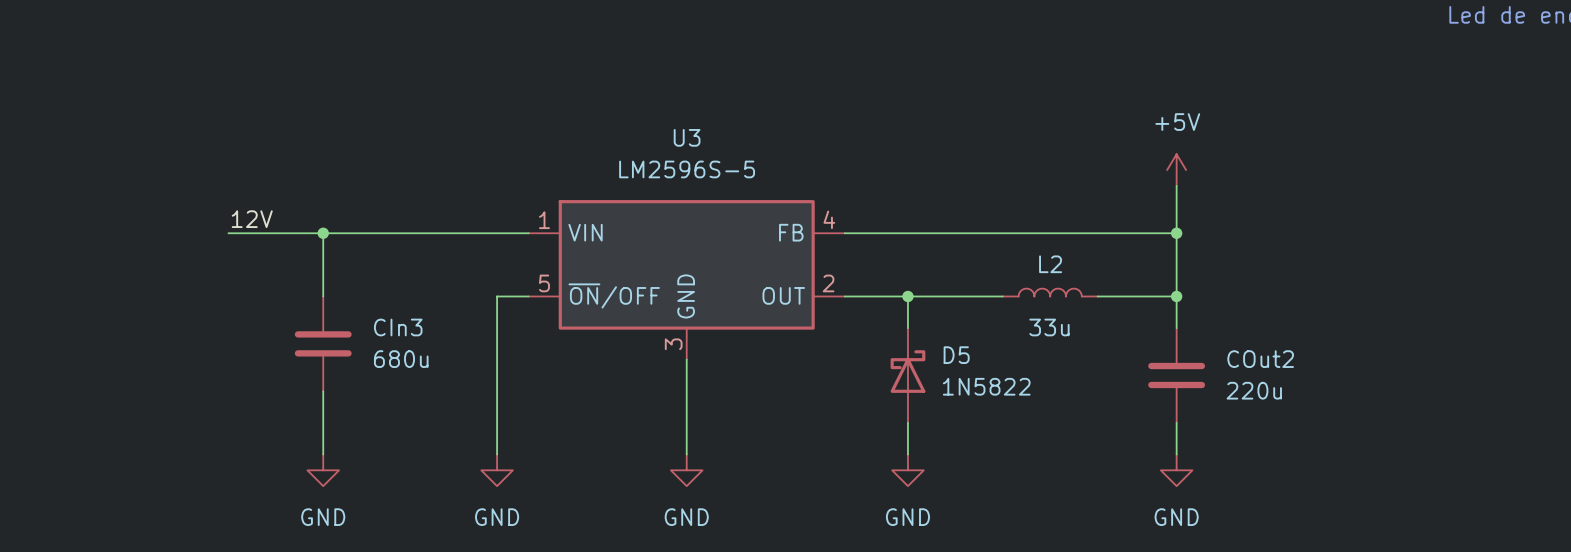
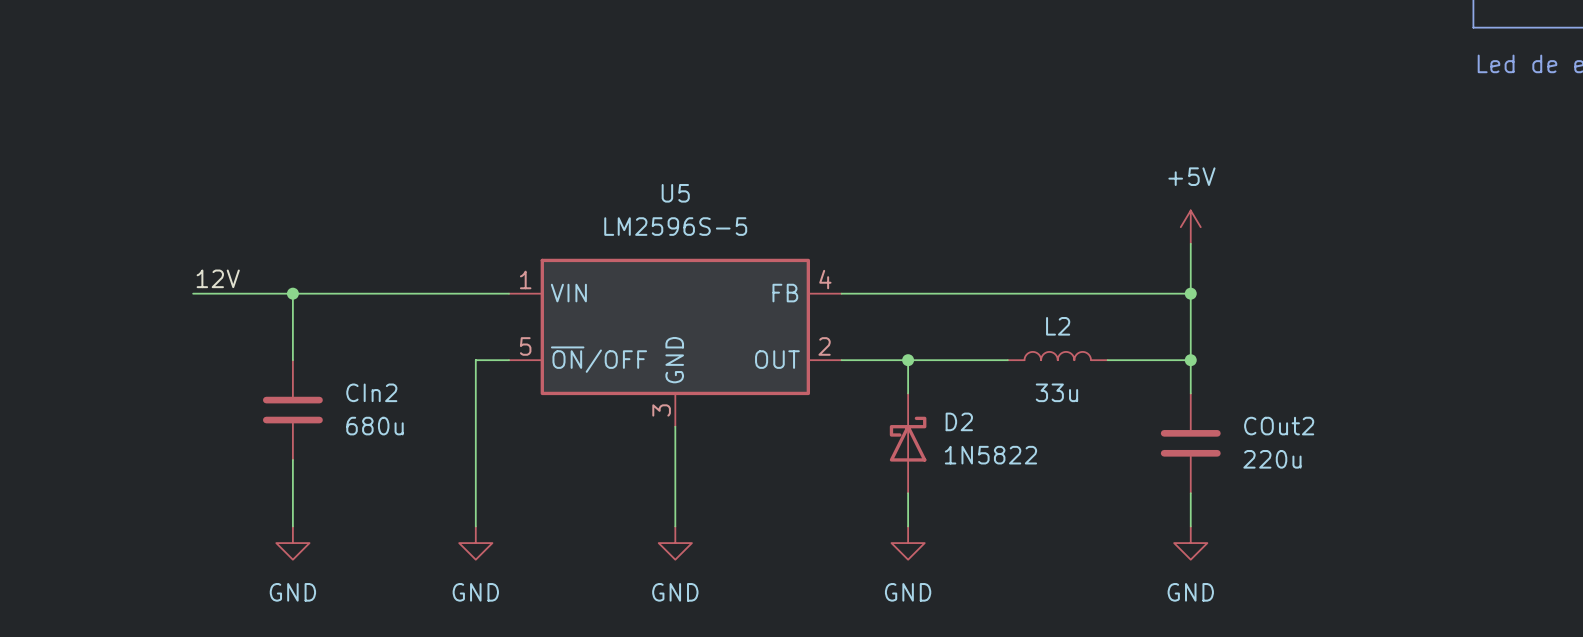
U3 name: U3 (687, 137) -> U5 (675, 193)
CIn3 name: CIn3 (398, 327) -> CIn2 (371, 392)
D5 name: D5 (956, 355) -> D2 (959, 421)

